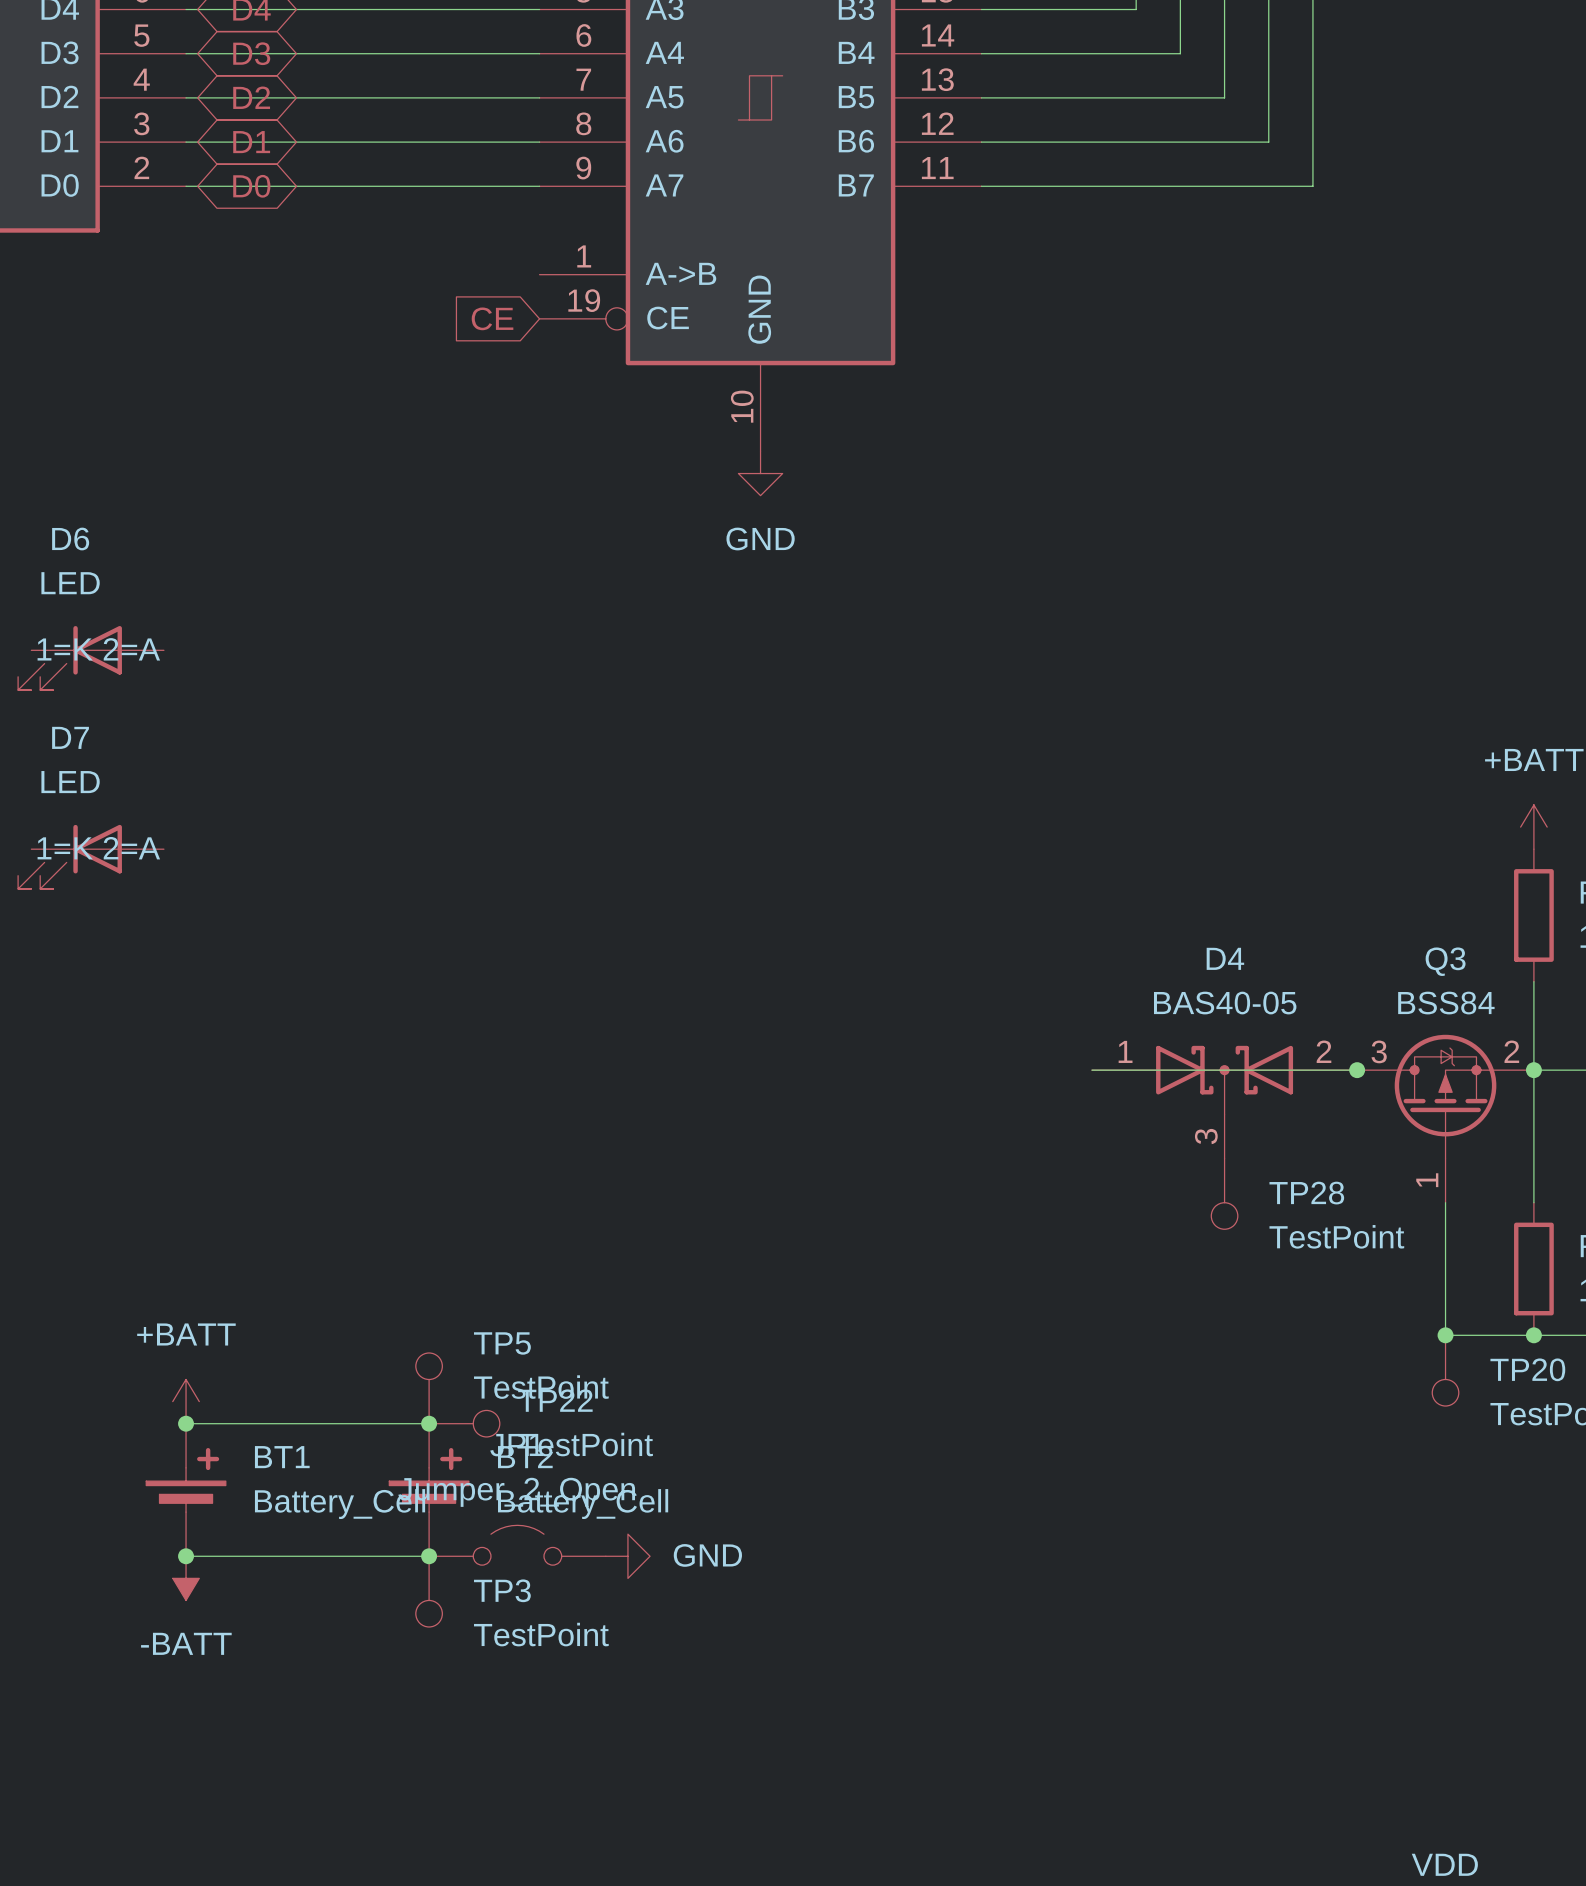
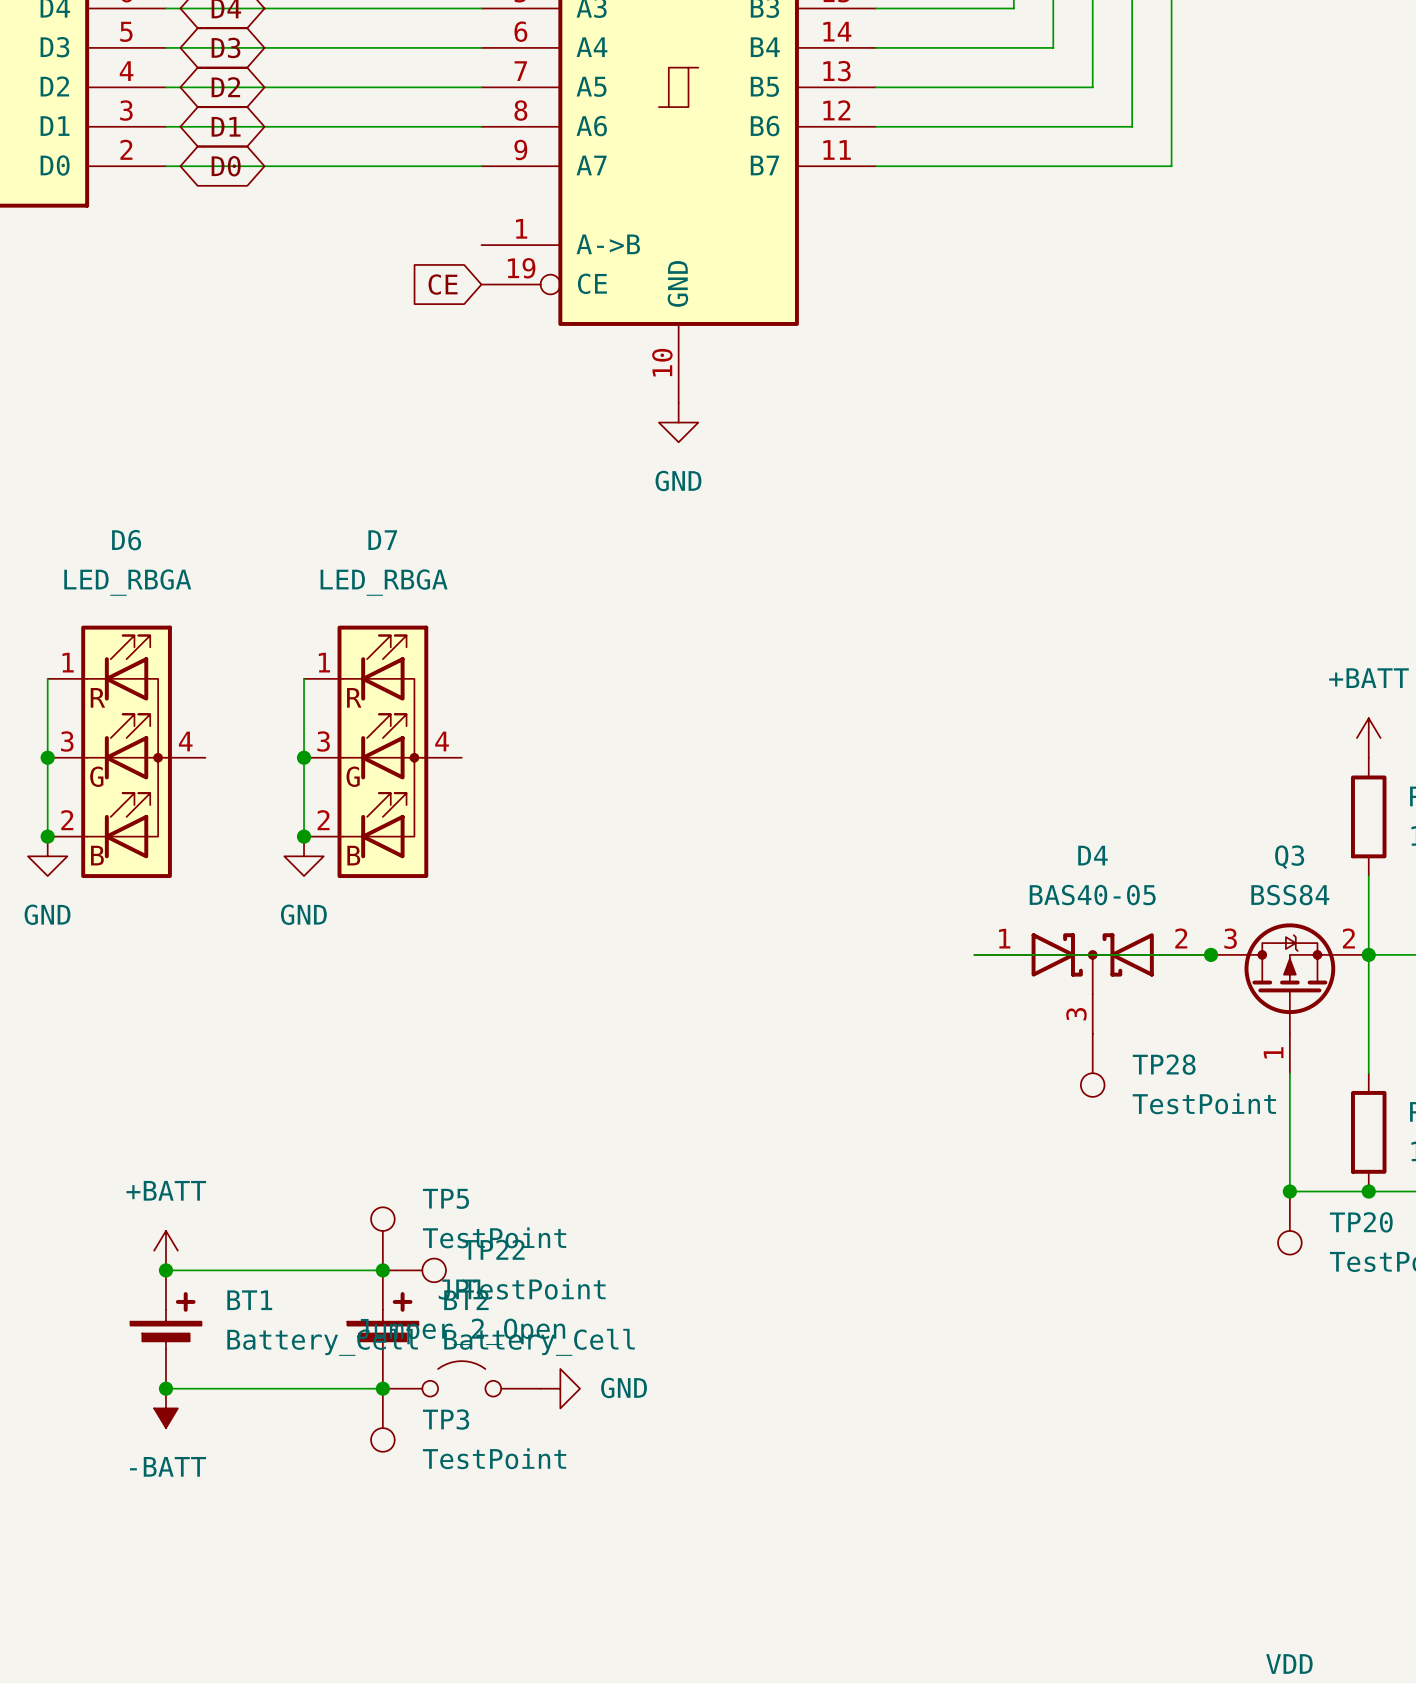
D6 name position: D6 (70, 539) -> D6 (126, 540)
D6 value: LED (70, 583) -> LED_RBGA (127, 582)
D6 symbol: [18, 626, 164, 691] -> [47, 625, 206, 879]
D6 text: 1=K 2=A (98, 649) -> none
D7 name position: D7 (70, 737) -> D7 (382, 540)
wire: none -> (47, 678) (47, 836)
wire: none -> (304, 678) (304, 836)
D7 value: LED (70, 782) -> LED_RBGA (384, 582)
D7 symbol: [18, 824, 164, 889] -> [304, 625, 462, 879]
D7 text: 1=K 2=A (98, 848) -> none
junction: none -> (47, 757)
junction: none -> (304, 757)
junction: none -> (47, 836)
junction: none -> (304, 836)
power symbol: none -> GND (47, 856)
power symbol: none -> GND (304, 856)

